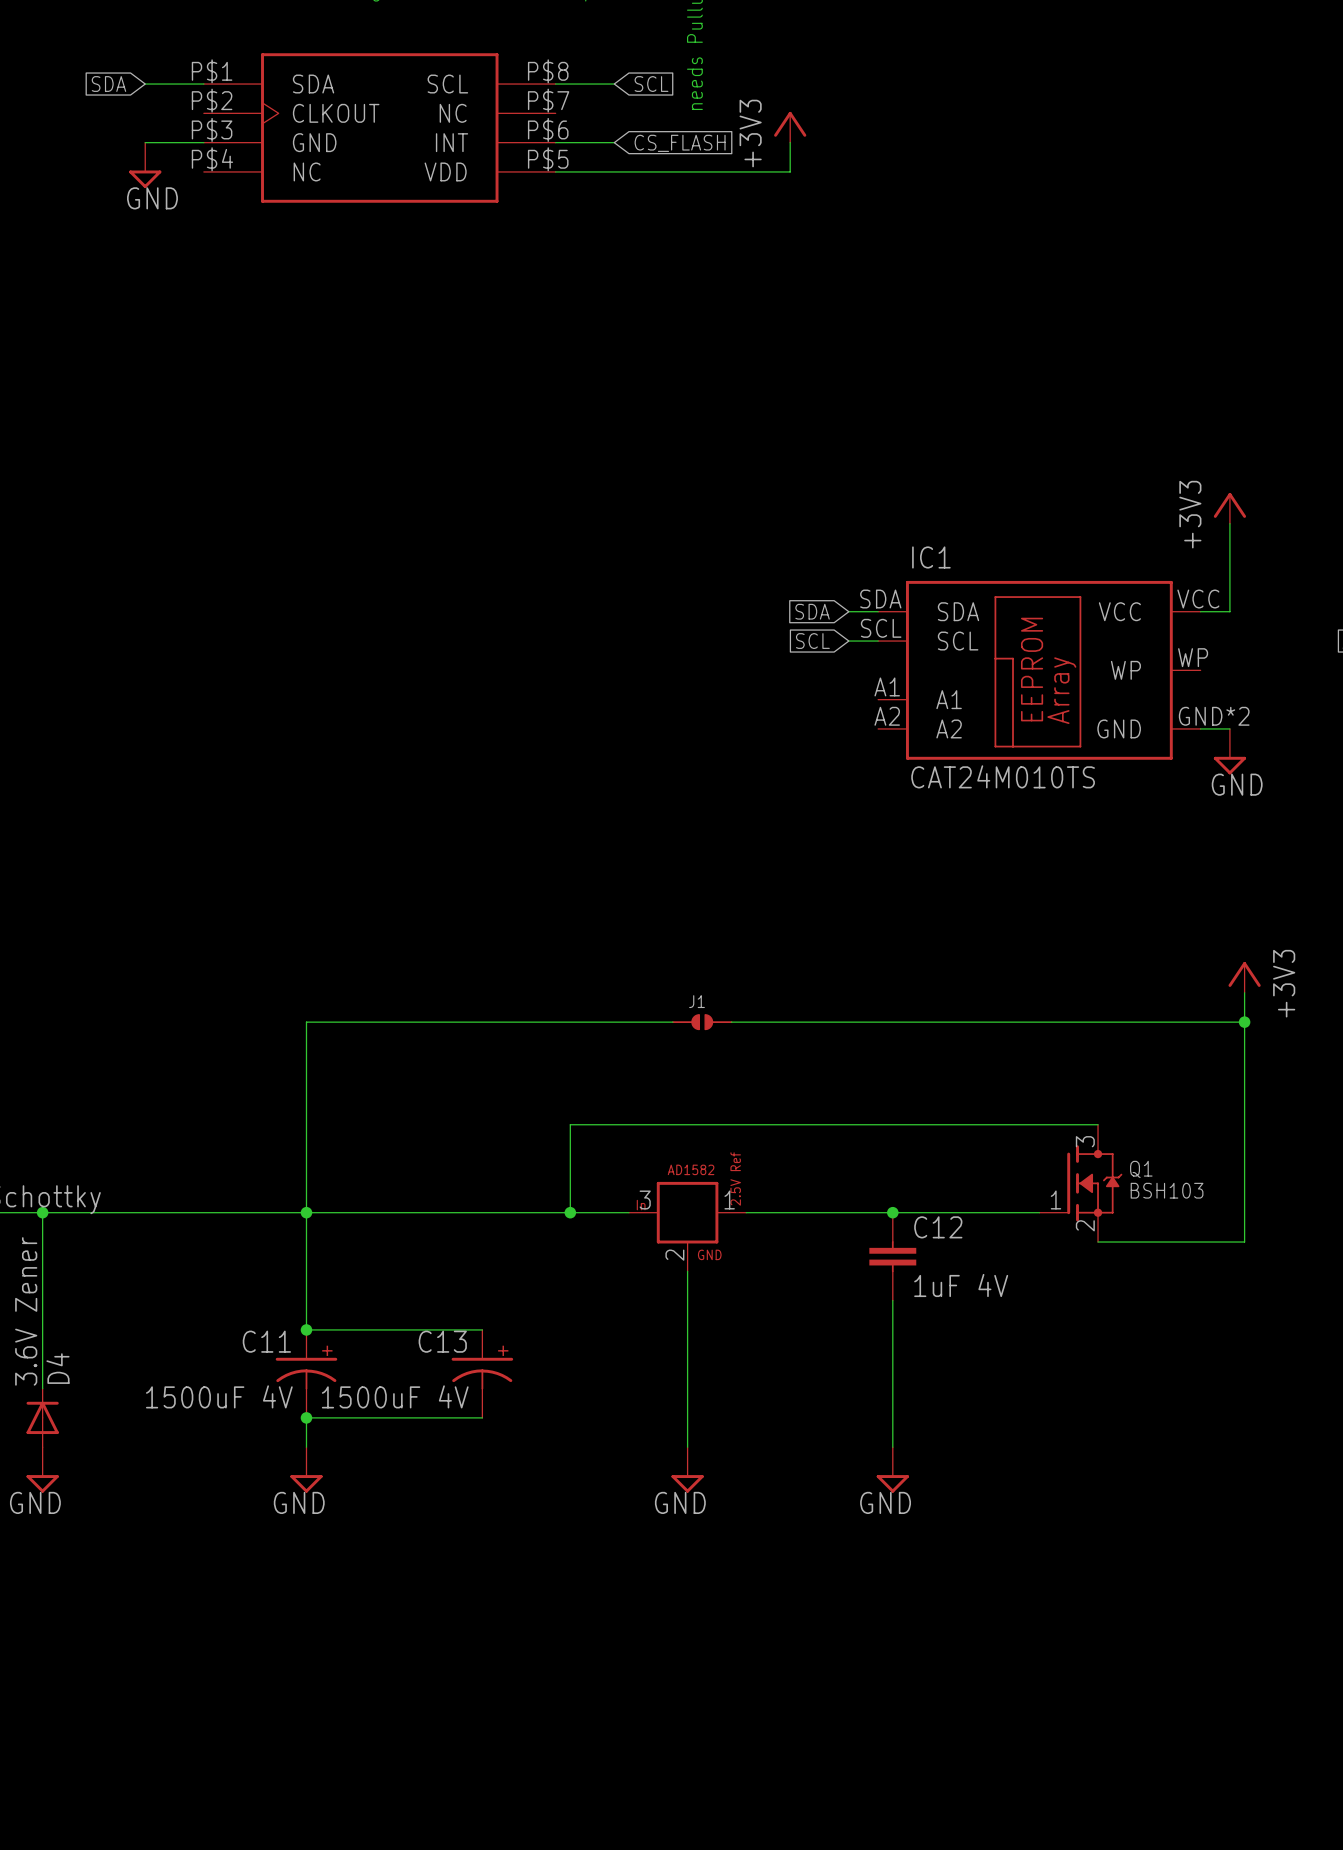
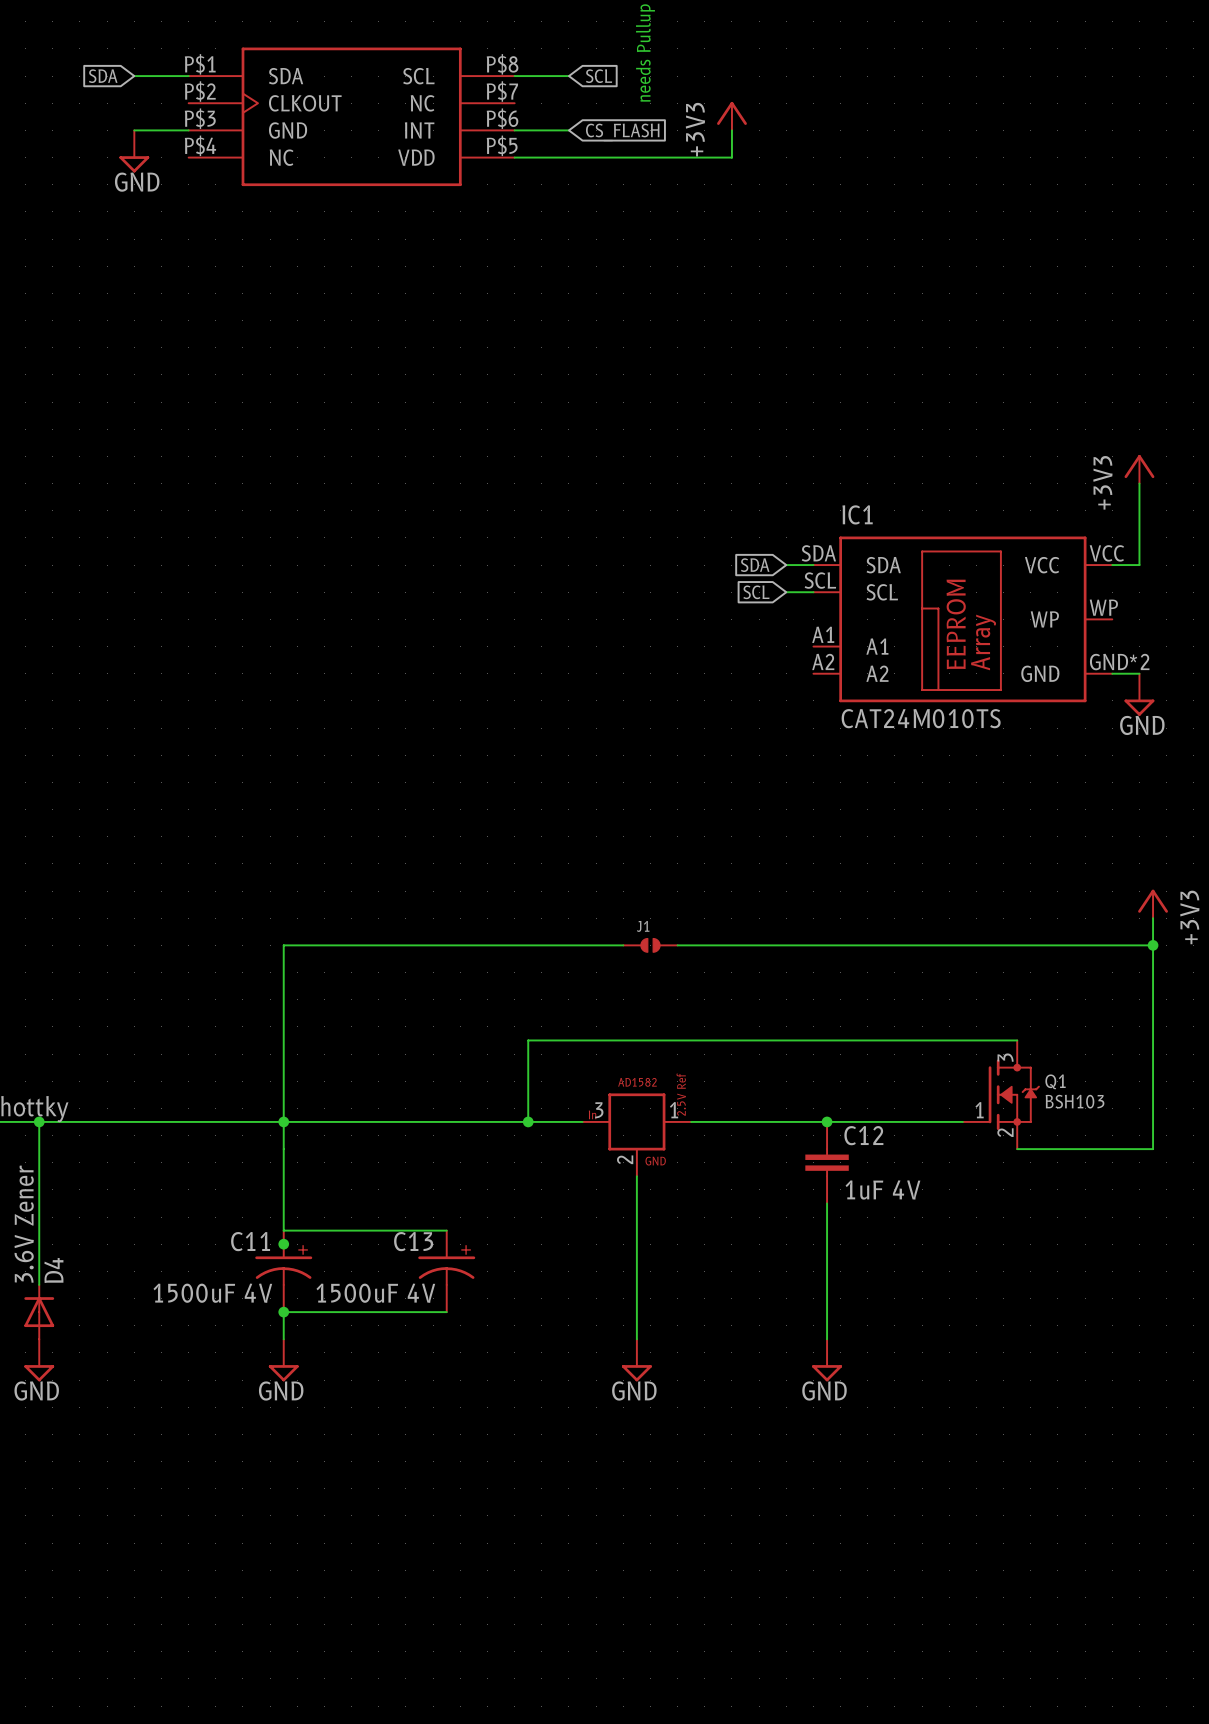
junction position: (306, 1329) -> (283, 1244)

